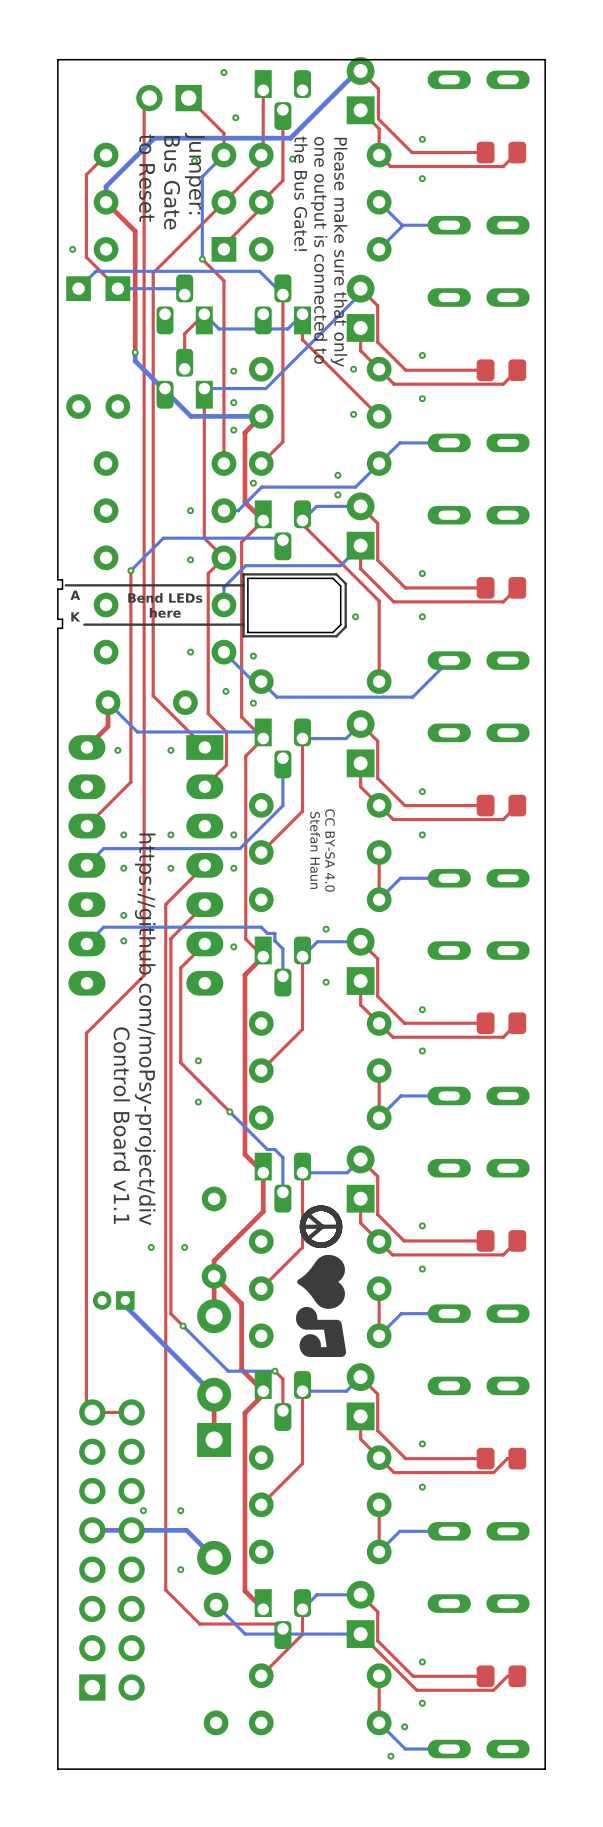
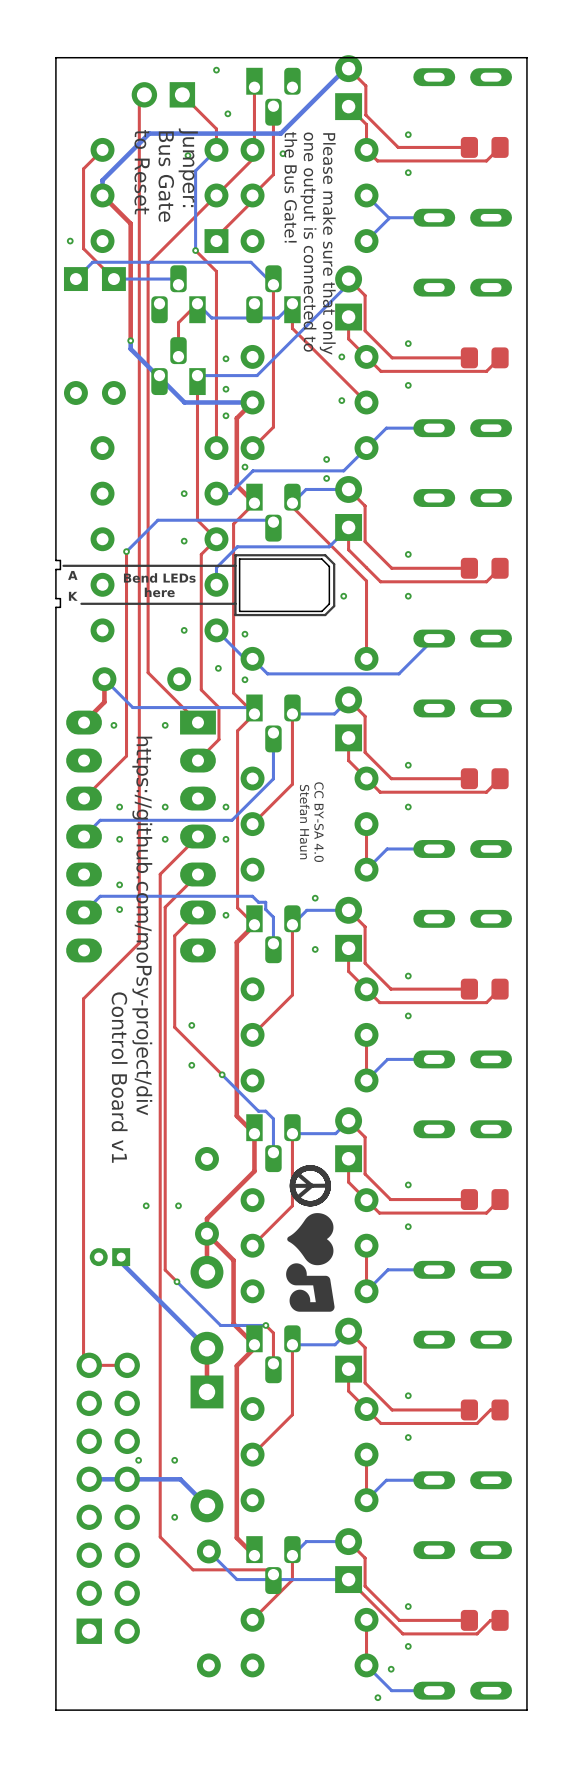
text: none -> https://github.com/moPsy-project/div (142, 926)
text: https://github.com/moPsy-project/div (145, 1029) -> none
text: Control Board v1.1 (121, 1125) -> Control Board v1 (119, 1077)

